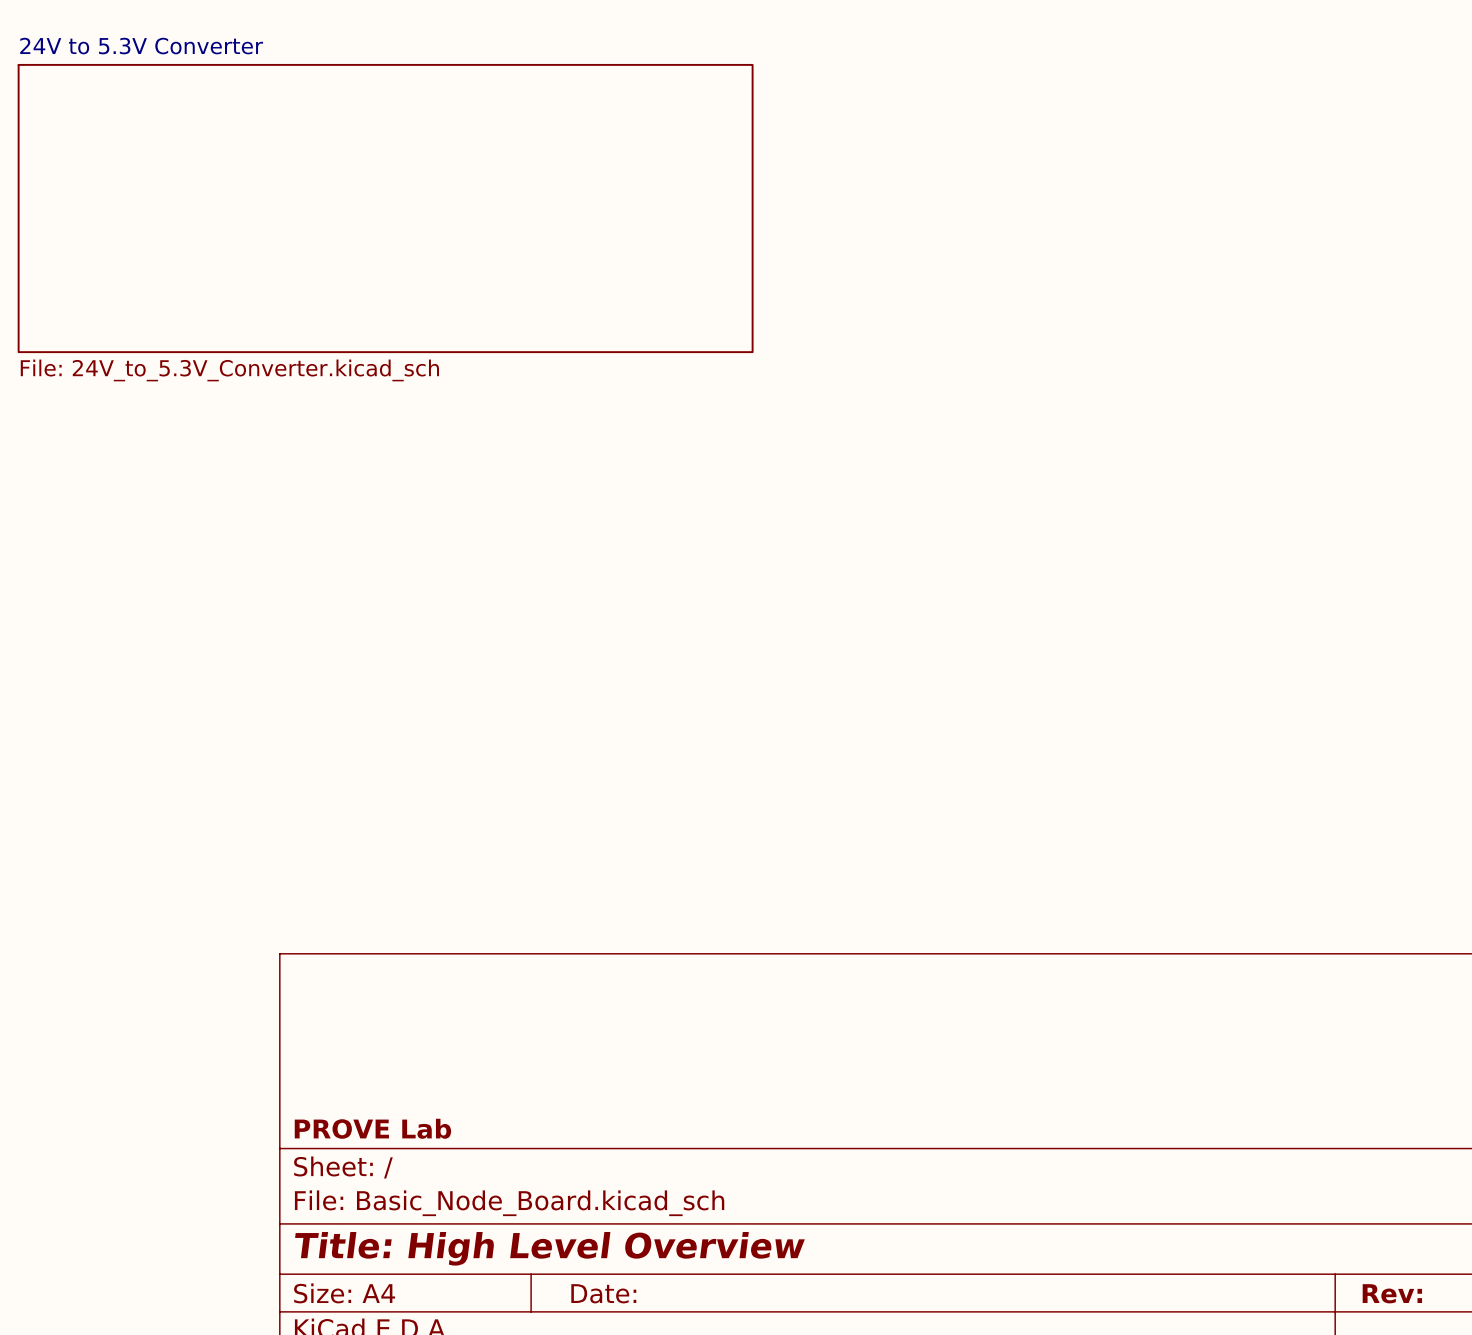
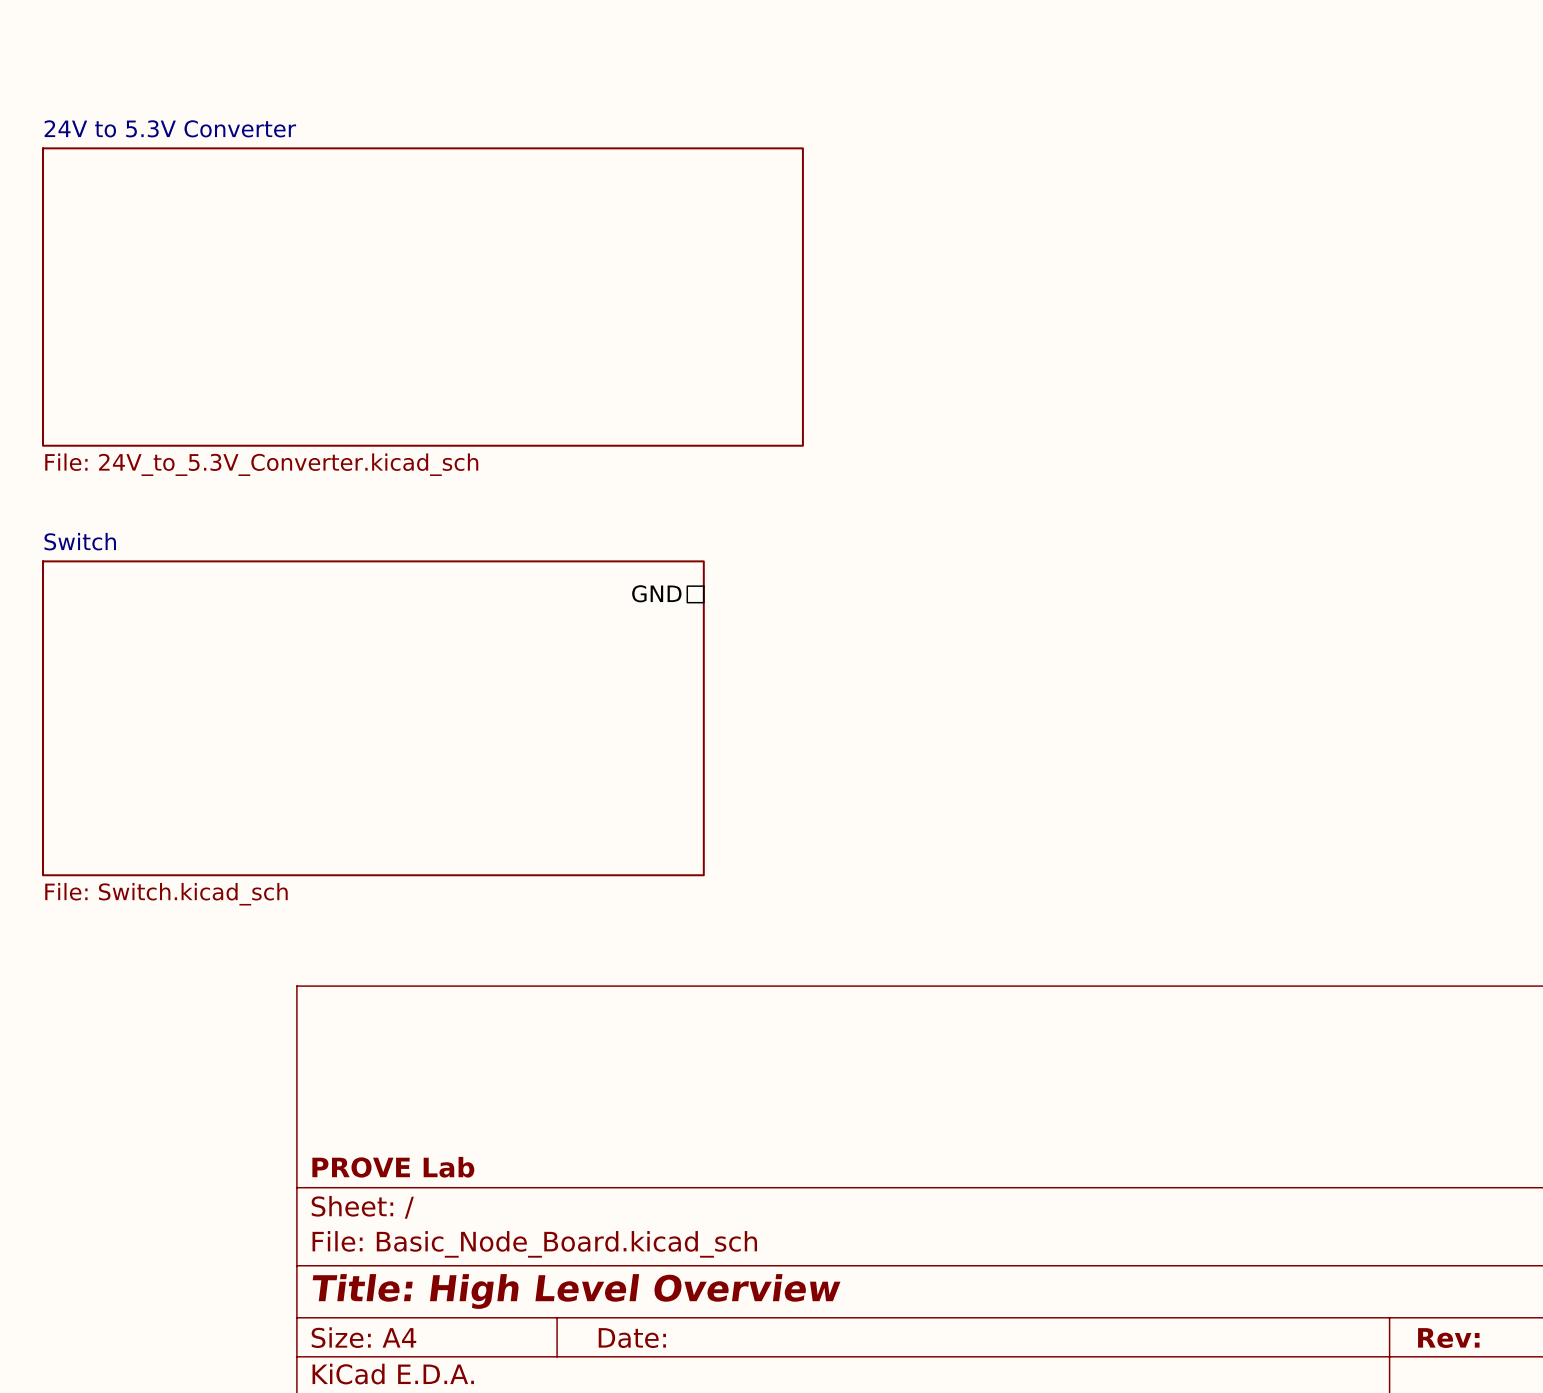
sheet 24V to 5.3V Converter position: (385, 208) -> (422, 297)
sheet pin: none -> GND (656, 593)
sheet Switch: none -> File: Switch.kicad_sch (373, 718)

